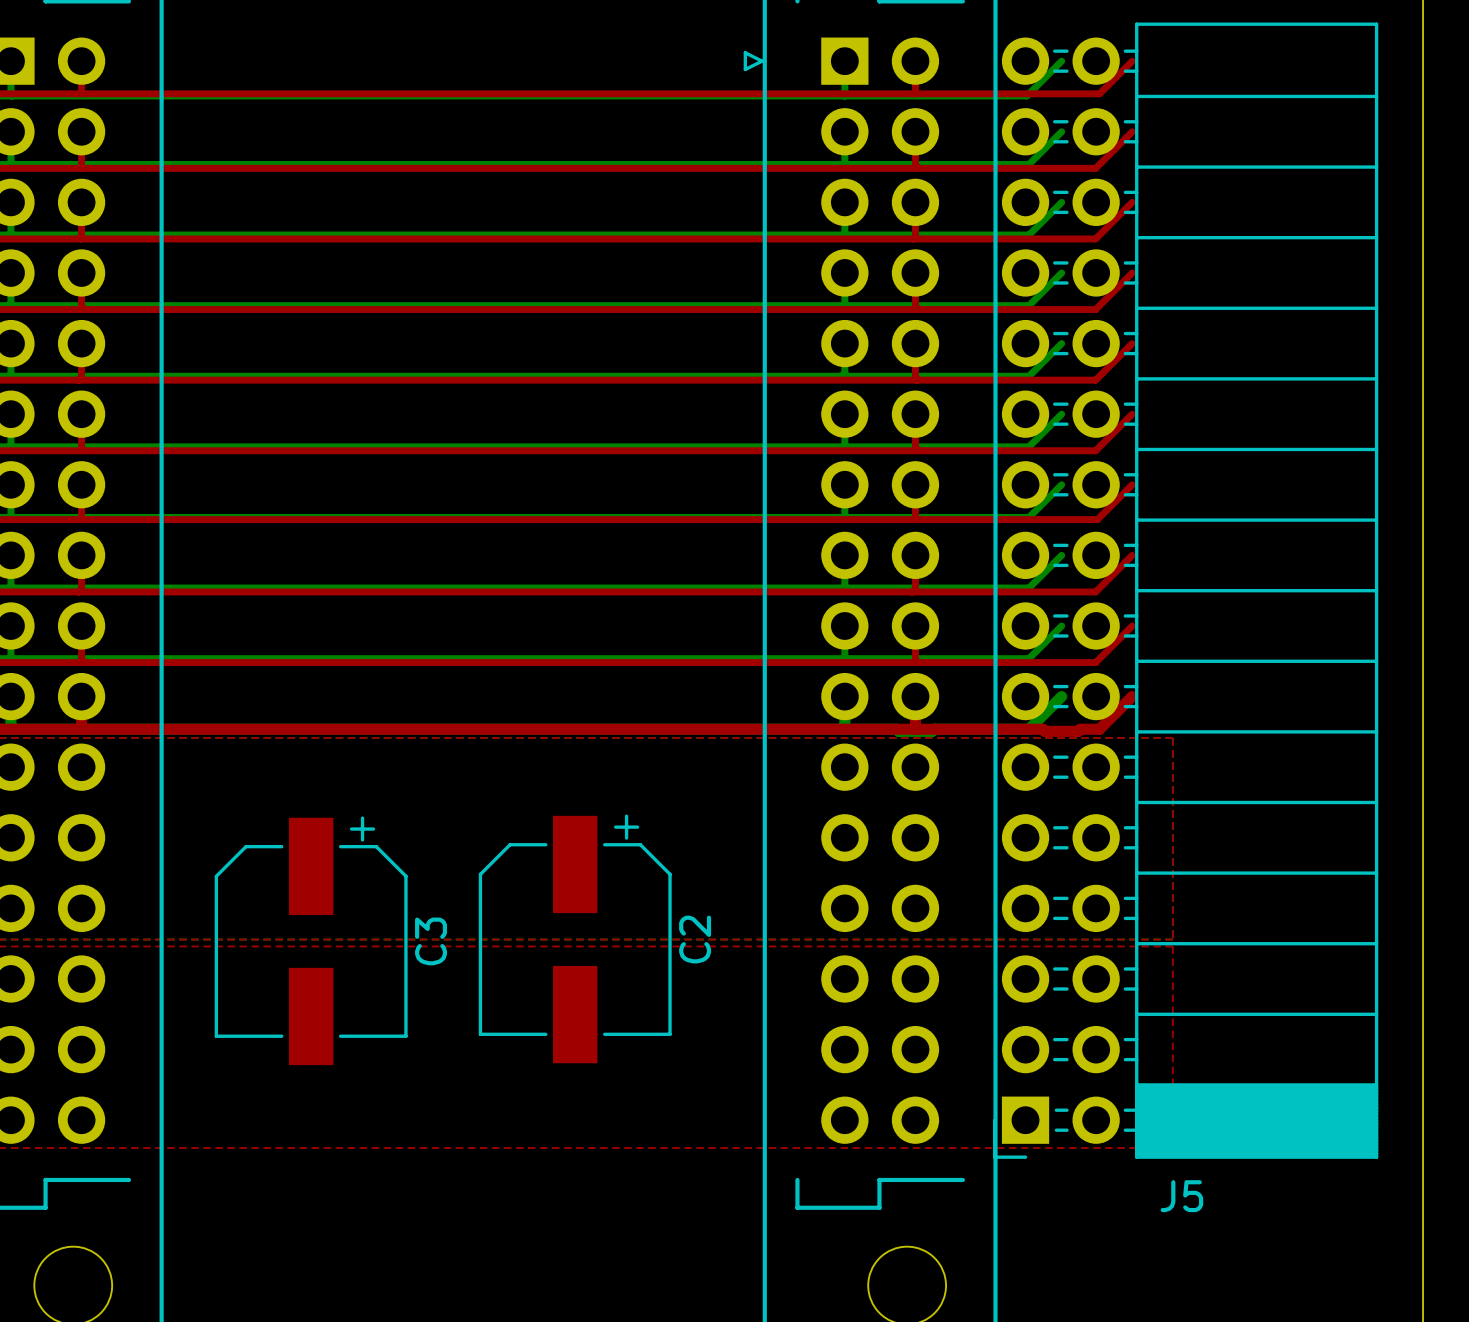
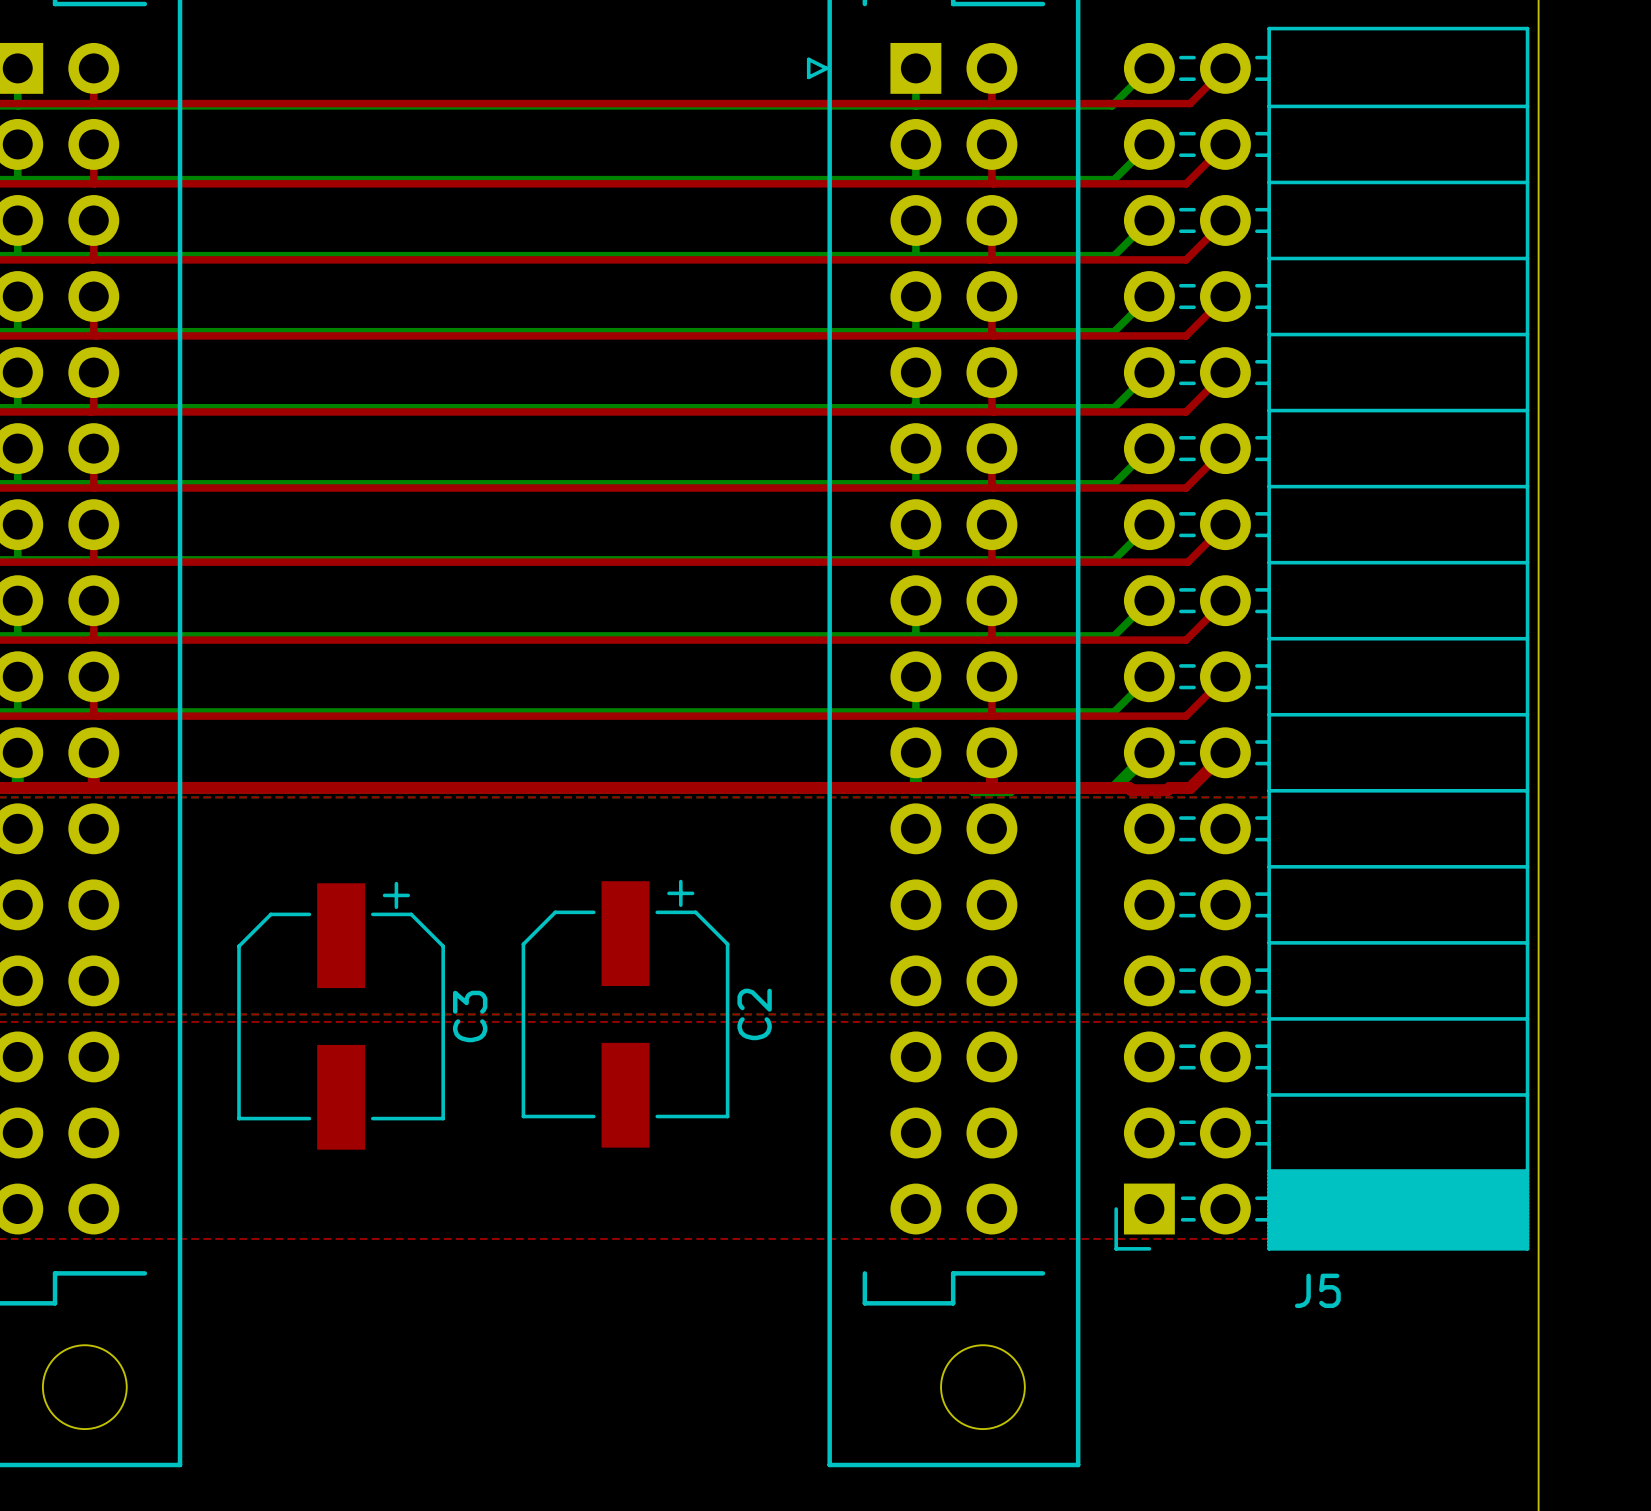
J5 position: (1185, 590) -> (1321, 638)

